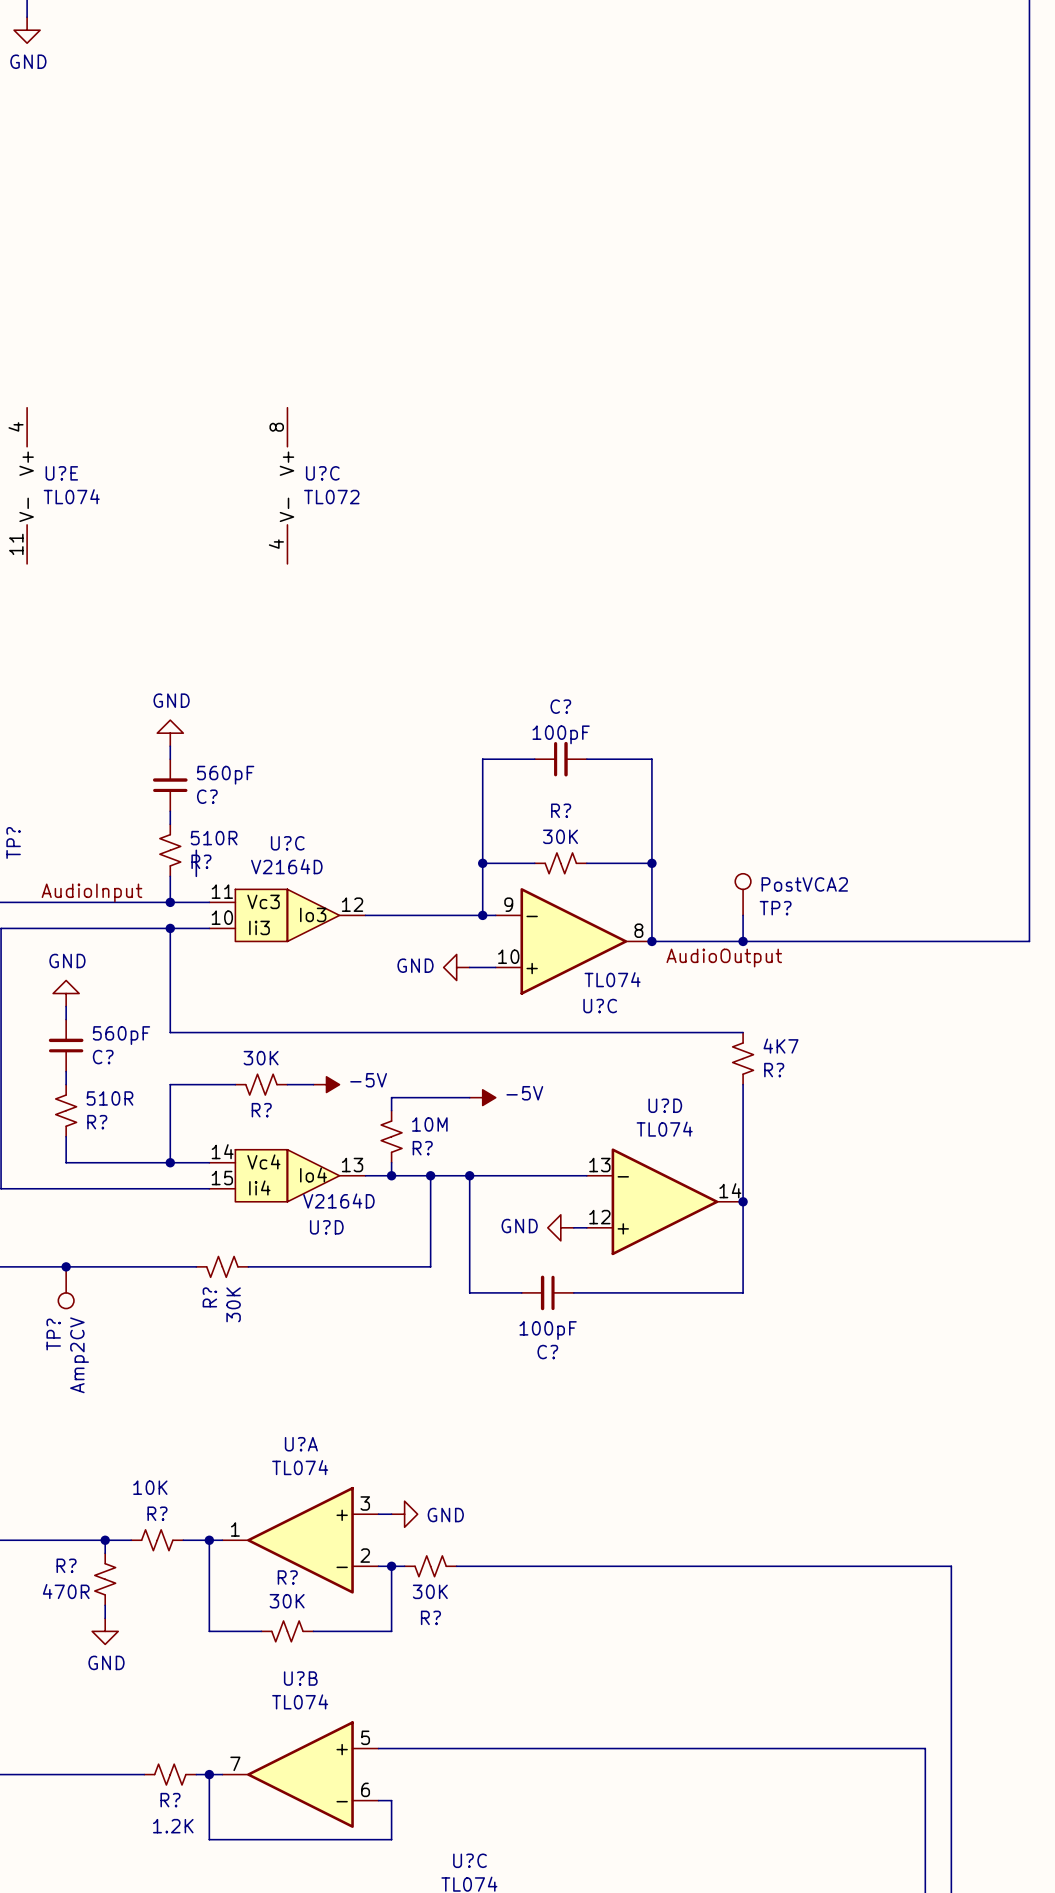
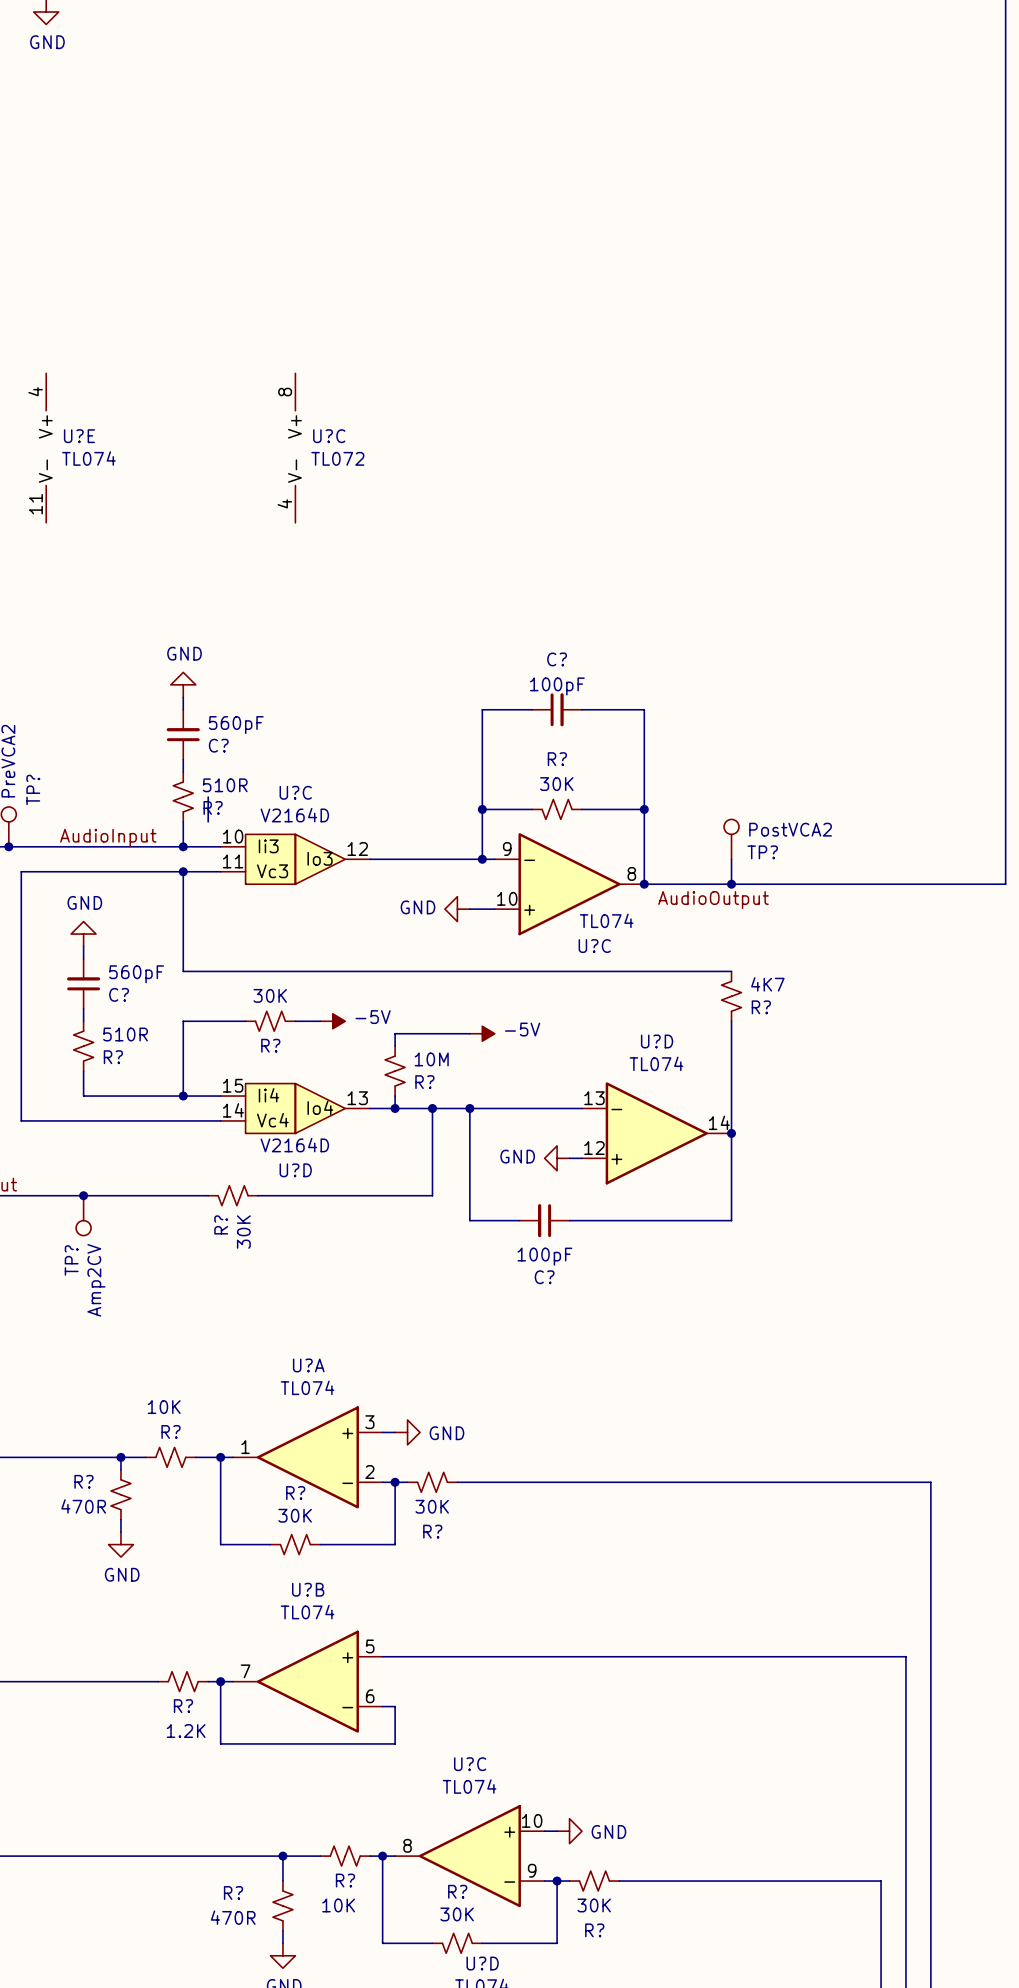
U?C flip: as is (287, 915) -> up-down (295, 859)
U?D flip: as is (287, 1175) -> up-down (295, 1108)
U?D value position: V2164D (338, 1201) -> V2164D (294, 1145)
U?D name position: U?D (326, 1227) -> U?D (295, 1170)

